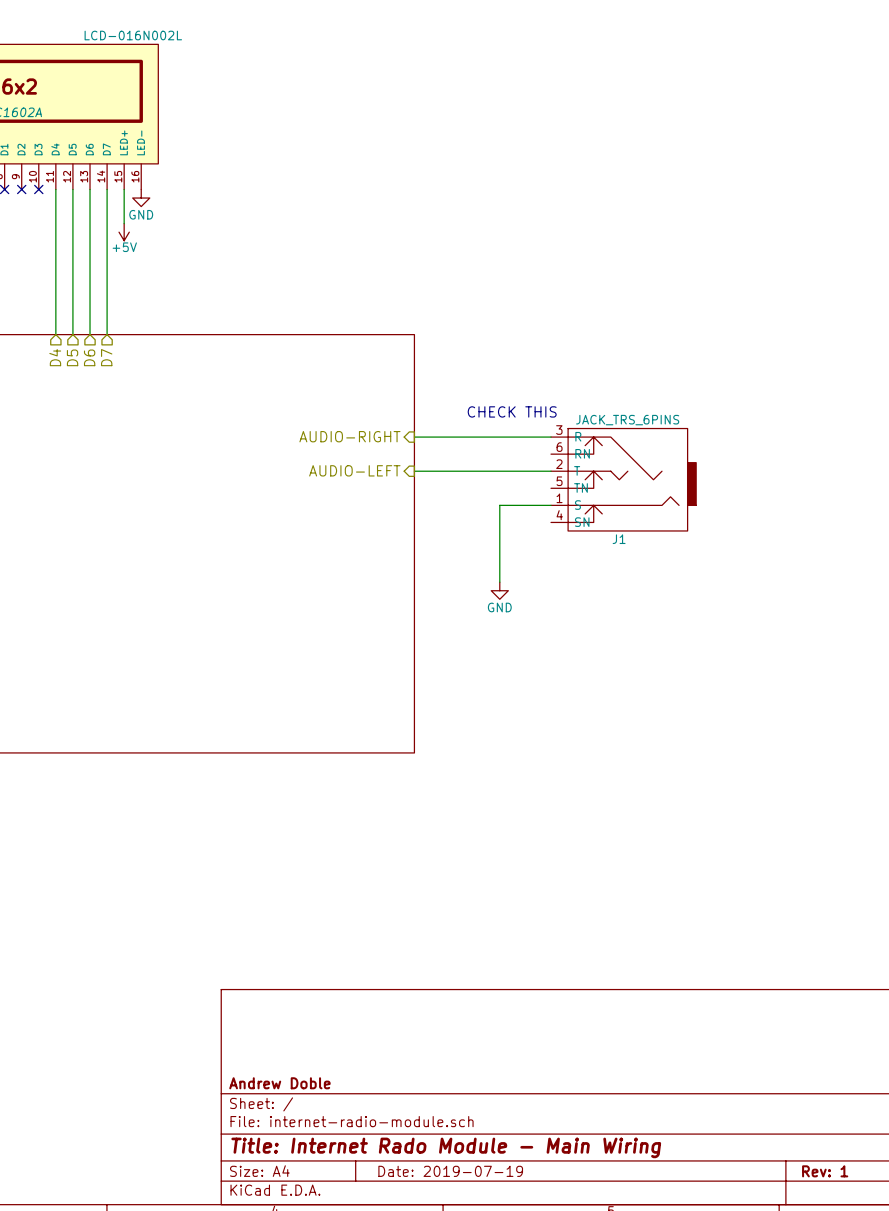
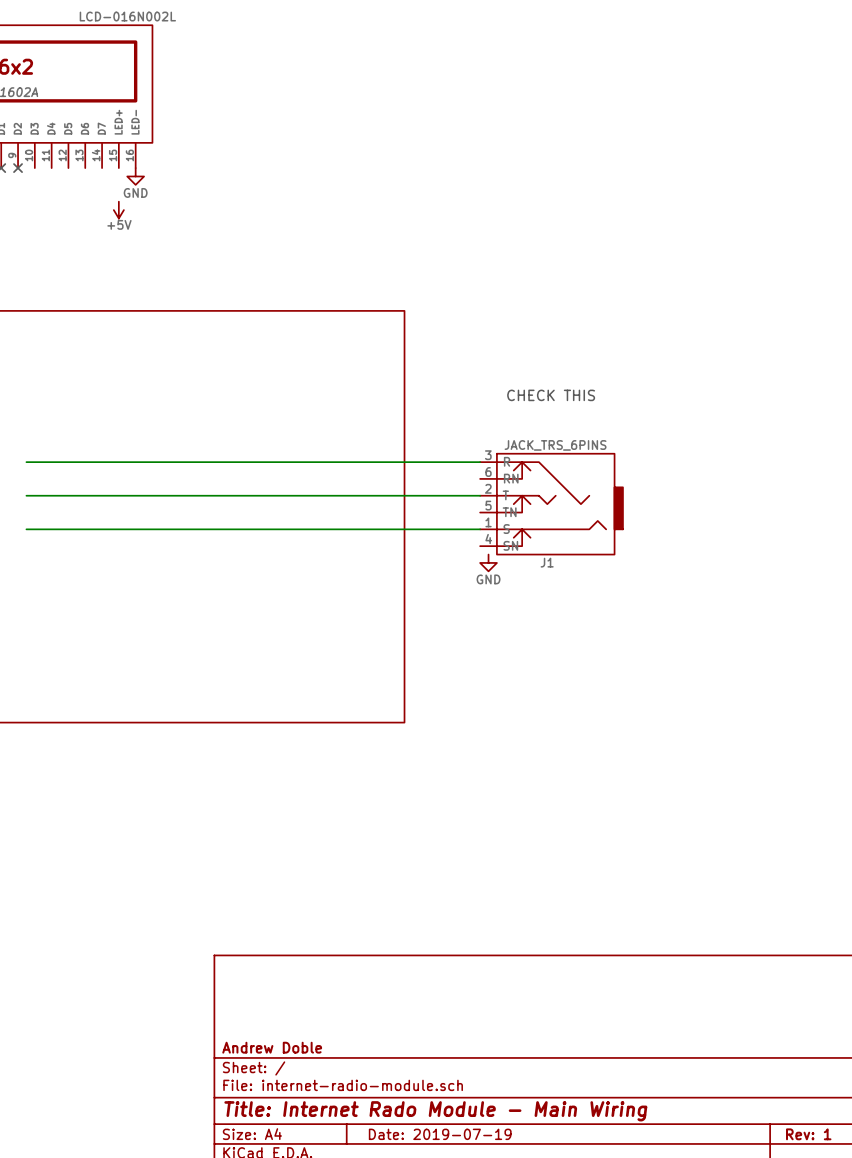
no-connect mark: (38, 189) -> none
wire: (55, 189) (55, 334) -> none
wire: (72, 189) (72, 334) -> none
wire: (90, 189) (90, 334) -> none
wire: (107, 189) (107, 334) -> none
wire: (124, 189) (124, 223) -> none
hierarchical label: D4 (55, 357) -> none
hierarchical label: D5 (72, 357) -> none
hierarchical label: D6 (89, 357) -> none
hierarchical label: D7 (106, 357) -> none
text position: CHECK THIS (512, 411) -> CHECK THIS (551, 395)
hierarchical label: AUDIO-RIGHT (349, 436) -> none
wire: (414, 437) (551, 437) -> none
hierarchical label: AUDIO-LEFT (354, 470) -> none
wire: (414, 471) (551, 471) -> none
J1 position: (623, 479) -> (551, 504)
wire: none -> (26, 462) (480, 462)
wire: (551, 505) (499, 505) (499, 582) -> none
wire: none -> (26, 495) (480, 495)
wire: none -> (26, 529) (480, 529)

